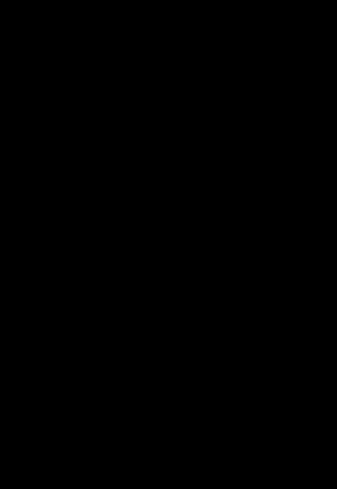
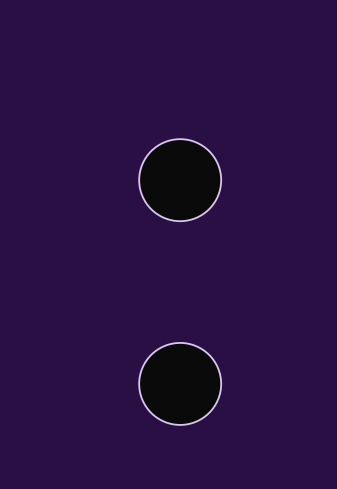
part: none -> (180, 180)
part: none -> (180, 383)

